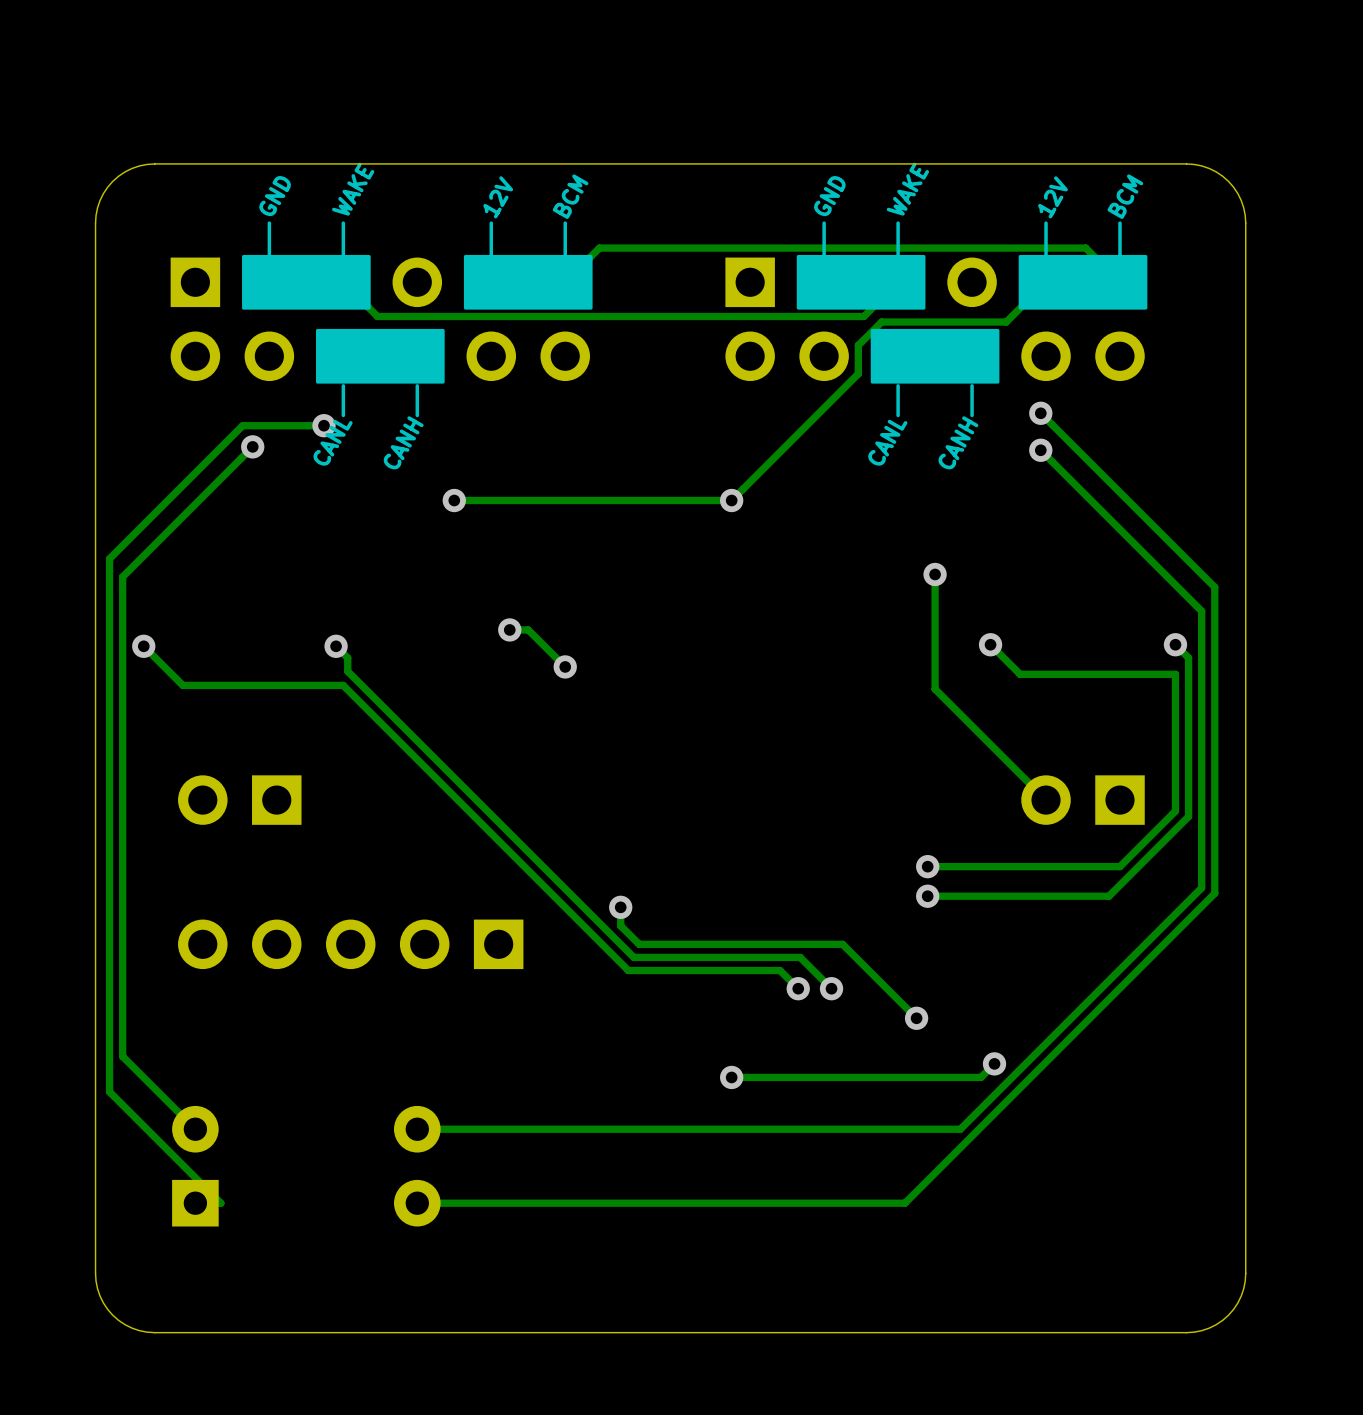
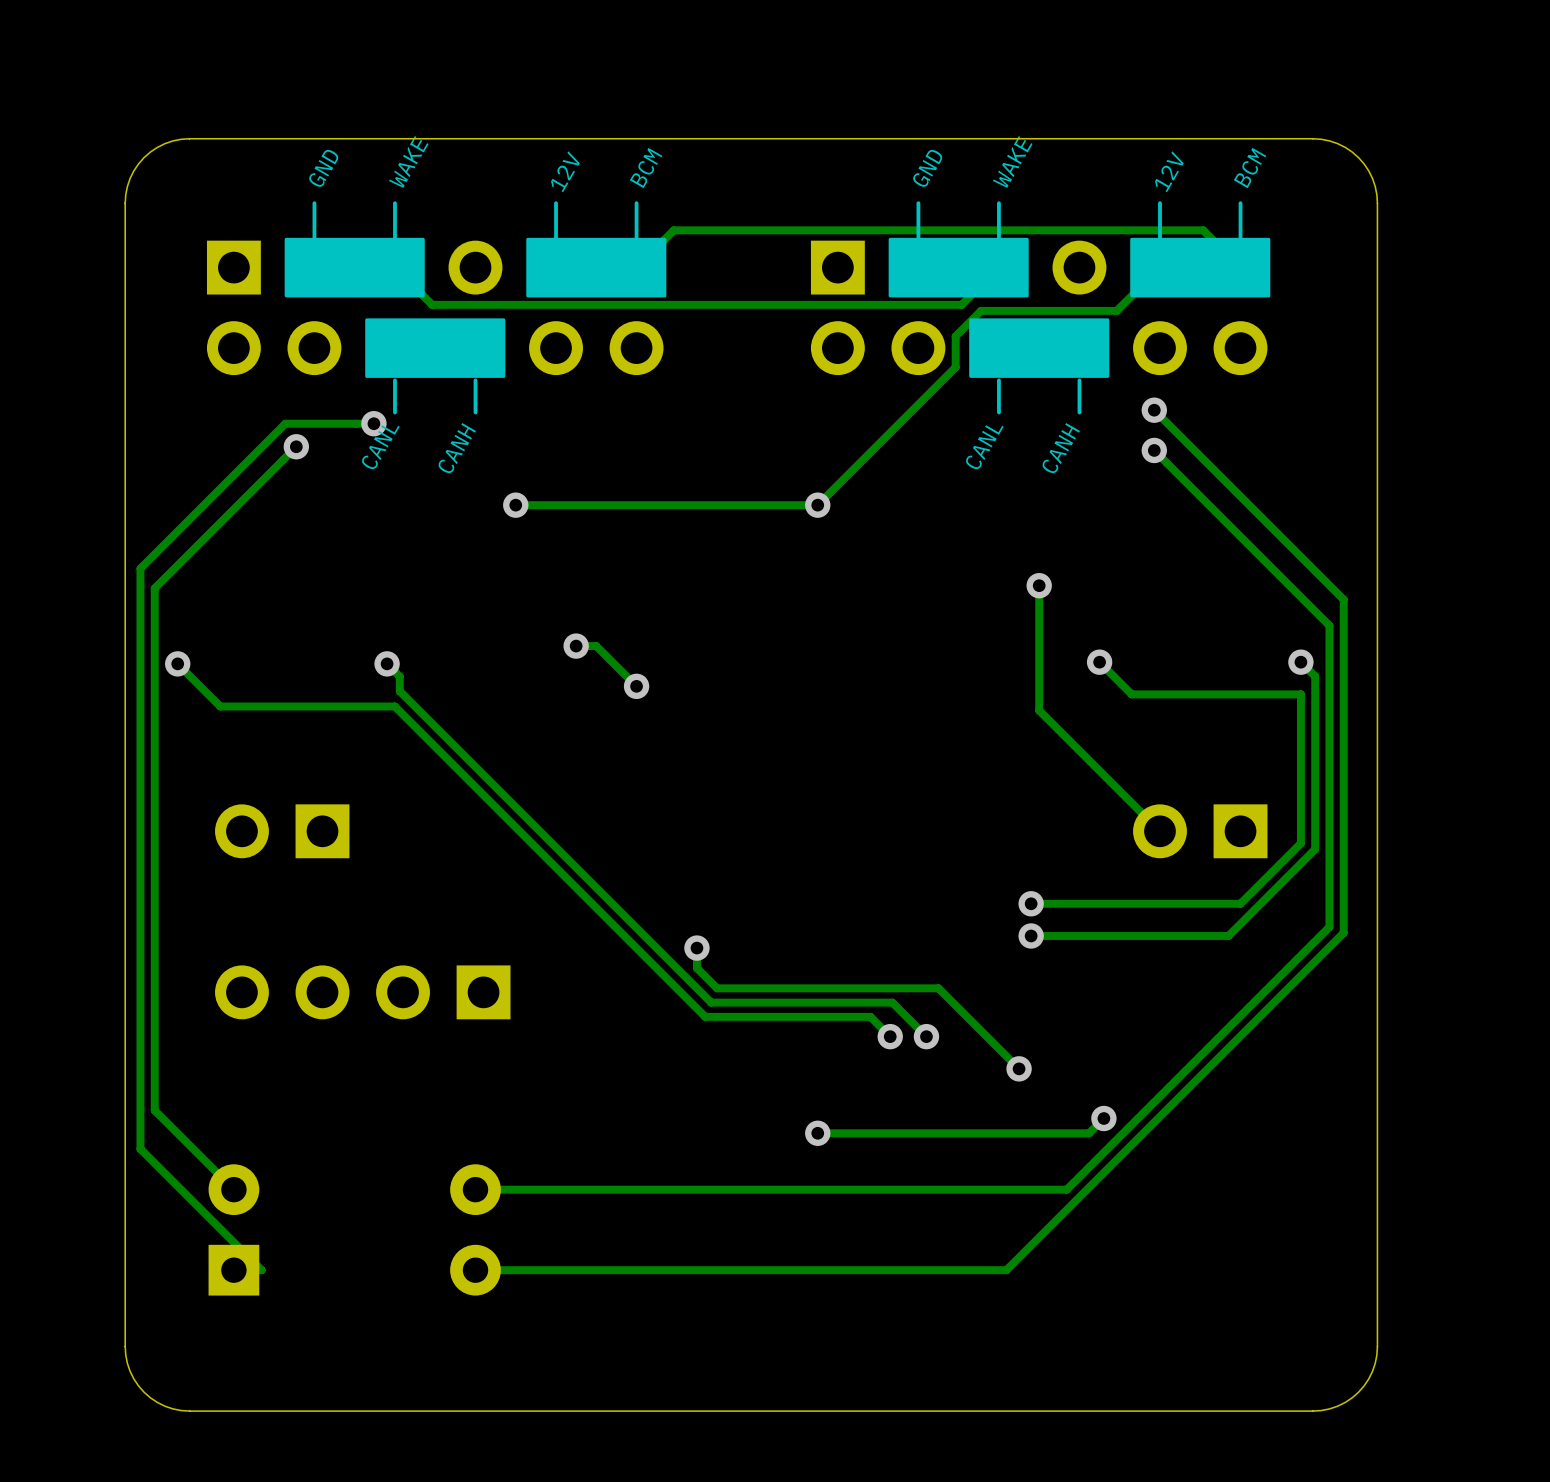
part: (350, 944) -> none
part: none -> (362, 992)

